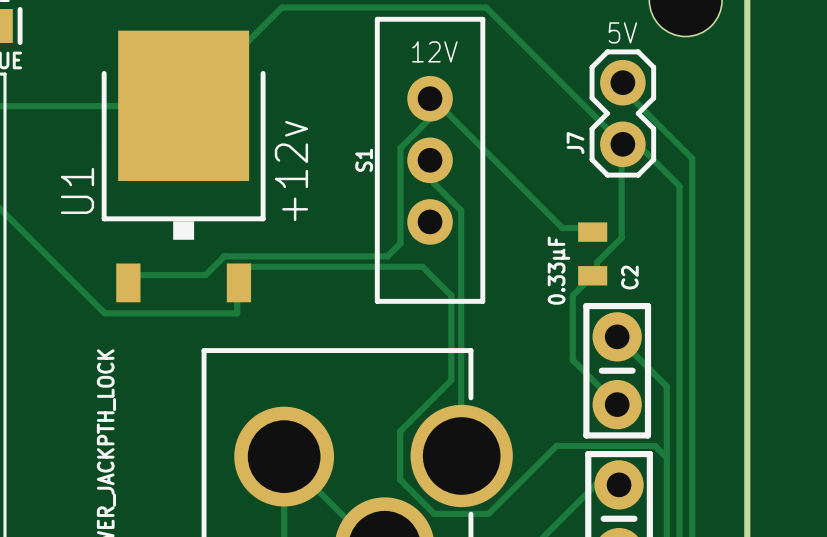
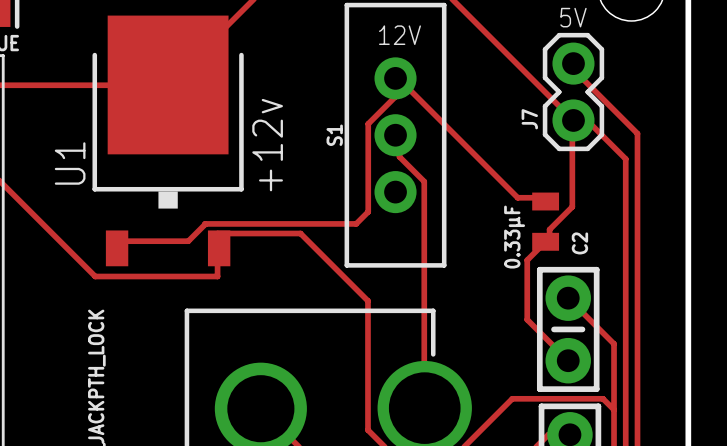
track: (327, 266) (422, 266) (451, 295) (451, 380) (400, 431) -> (300, 233) (367, 300) (367, 385)

